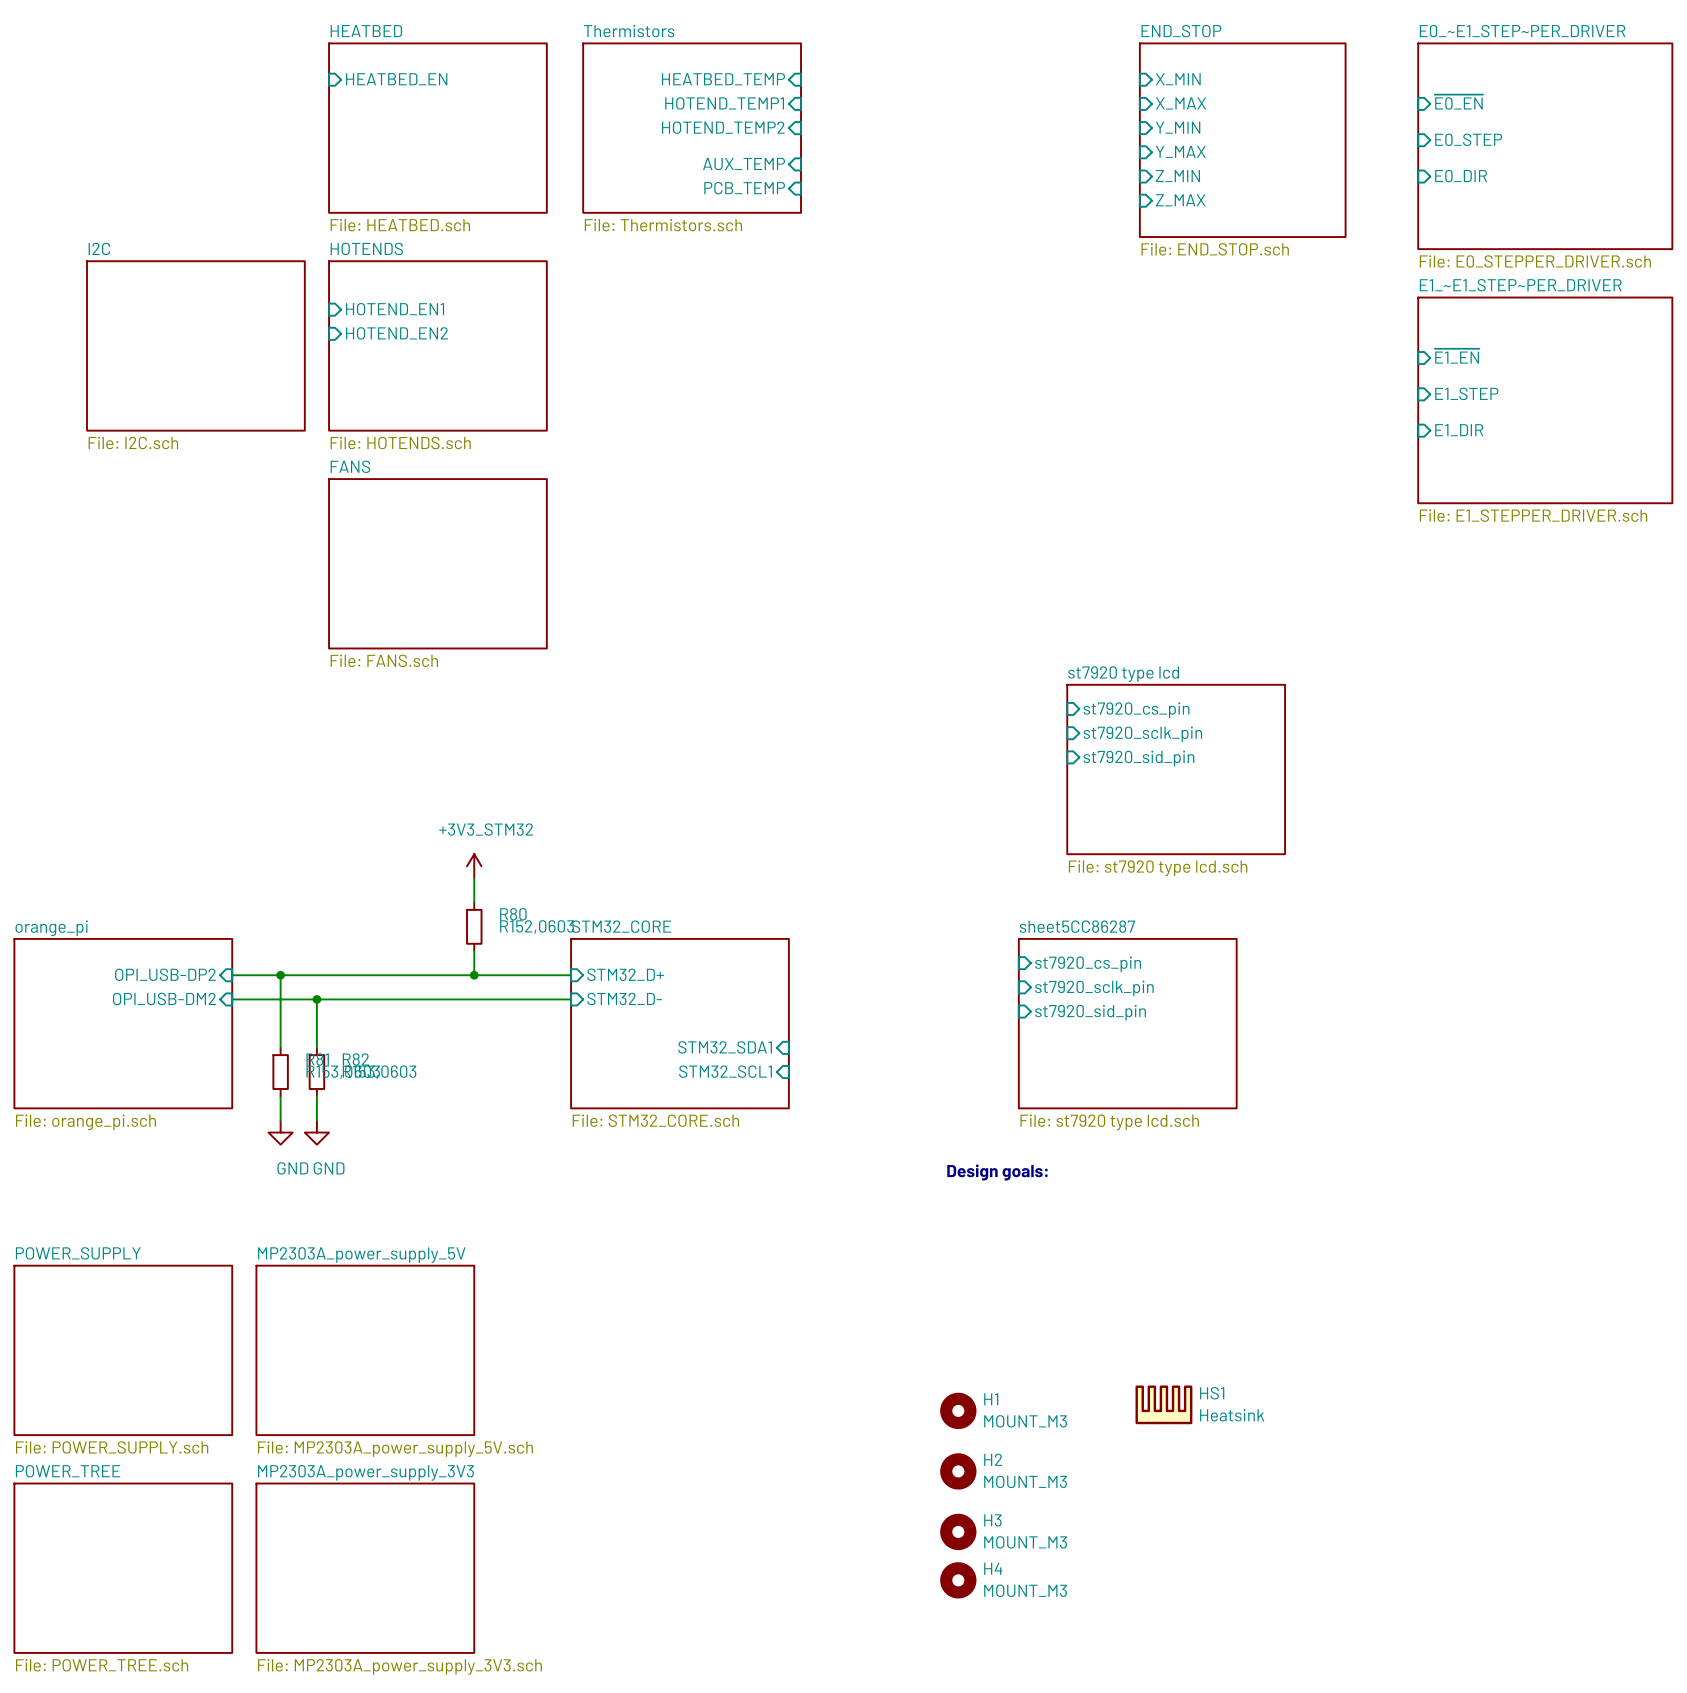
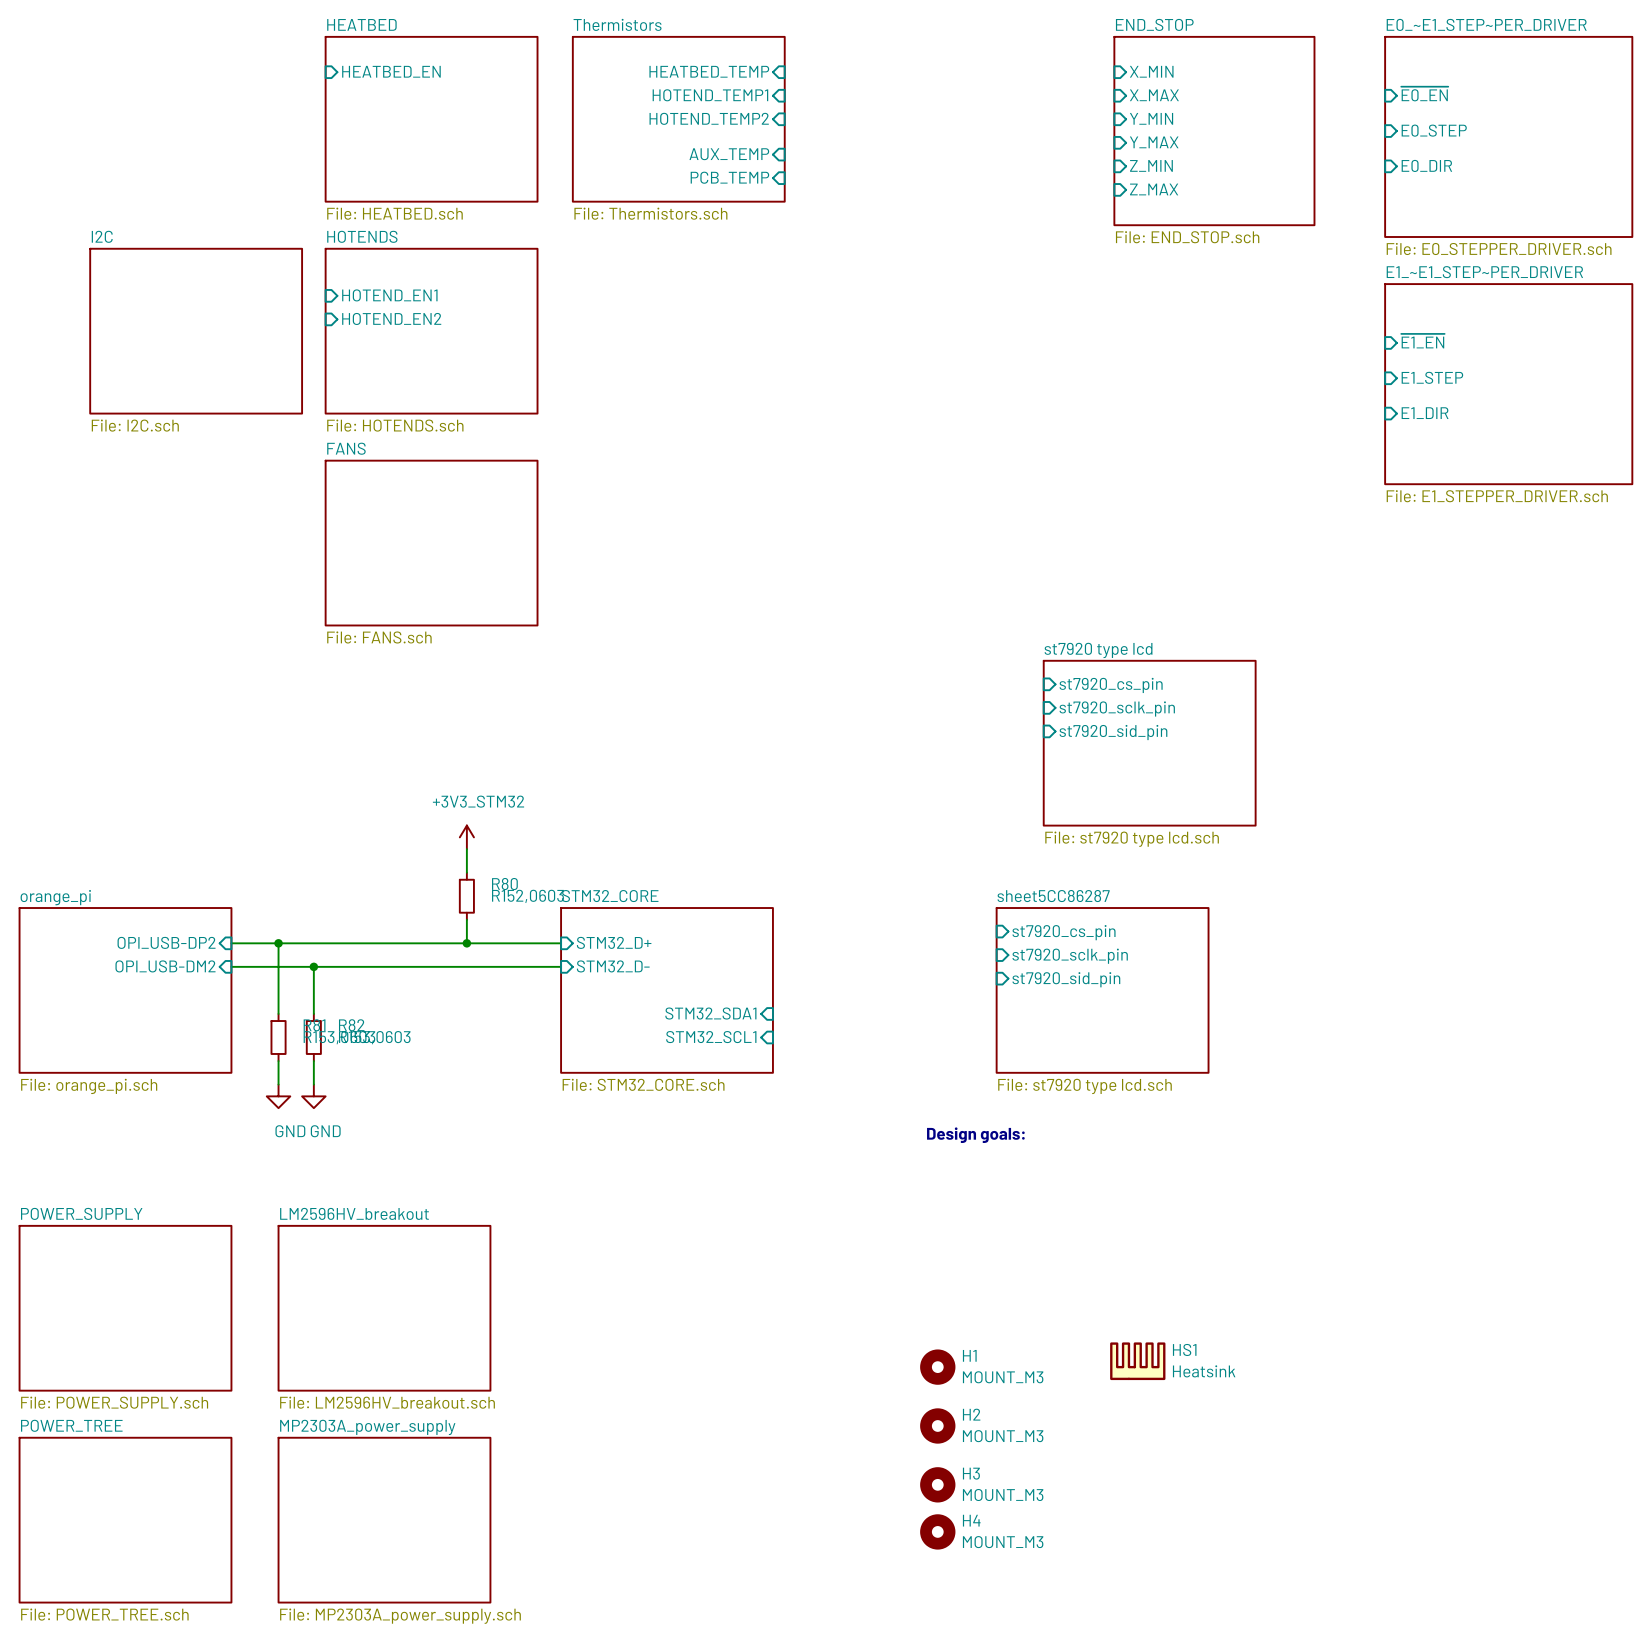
sheet MP2303A_power_supply_5V: File: MP2303A_power_supply_5V.sch (365, 1350) -> none
sheet LM2596HV_breakout: none -> File: LM2596HV_breakout.sch (384, 1308)
sheet MP2303A_power_supply_3V3: File: MP2303A_power_supply_3V3.sch (365, 1568) -> none
sheet MP2303A_power_supply: none -> File: MP2303A_power_supply.sch (384, 1520)

